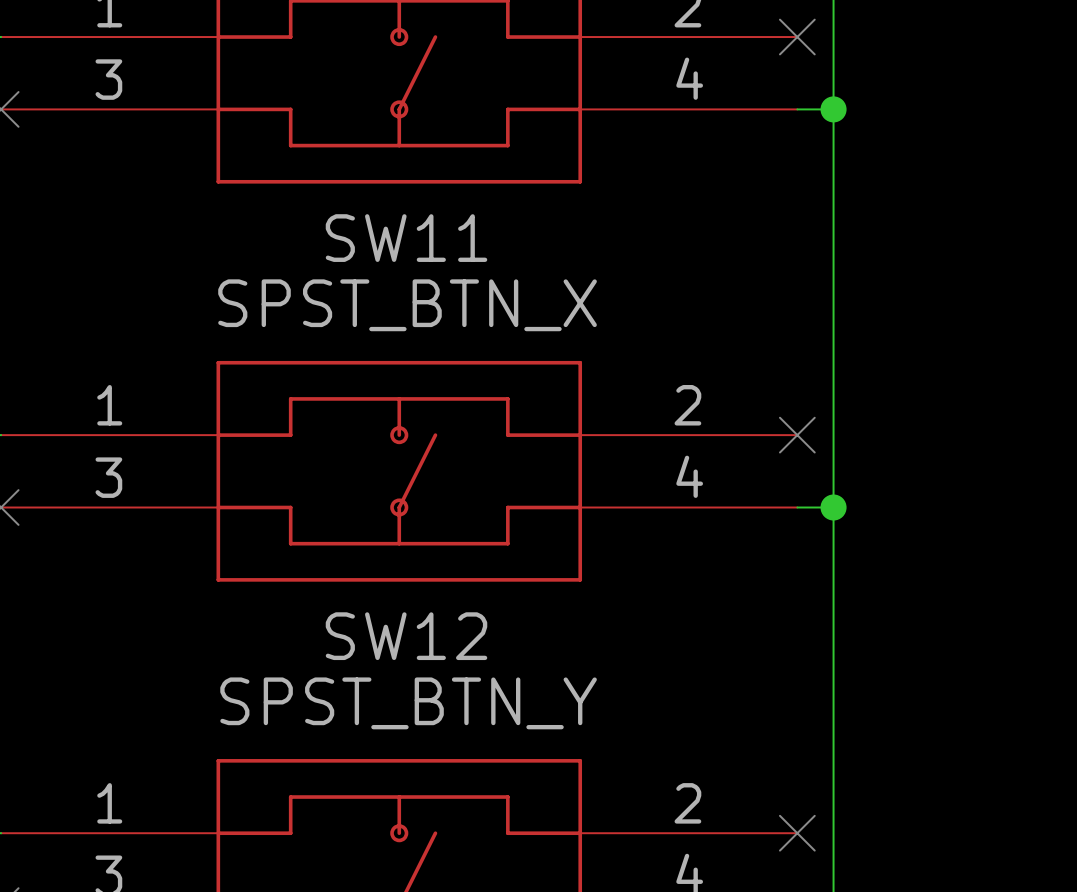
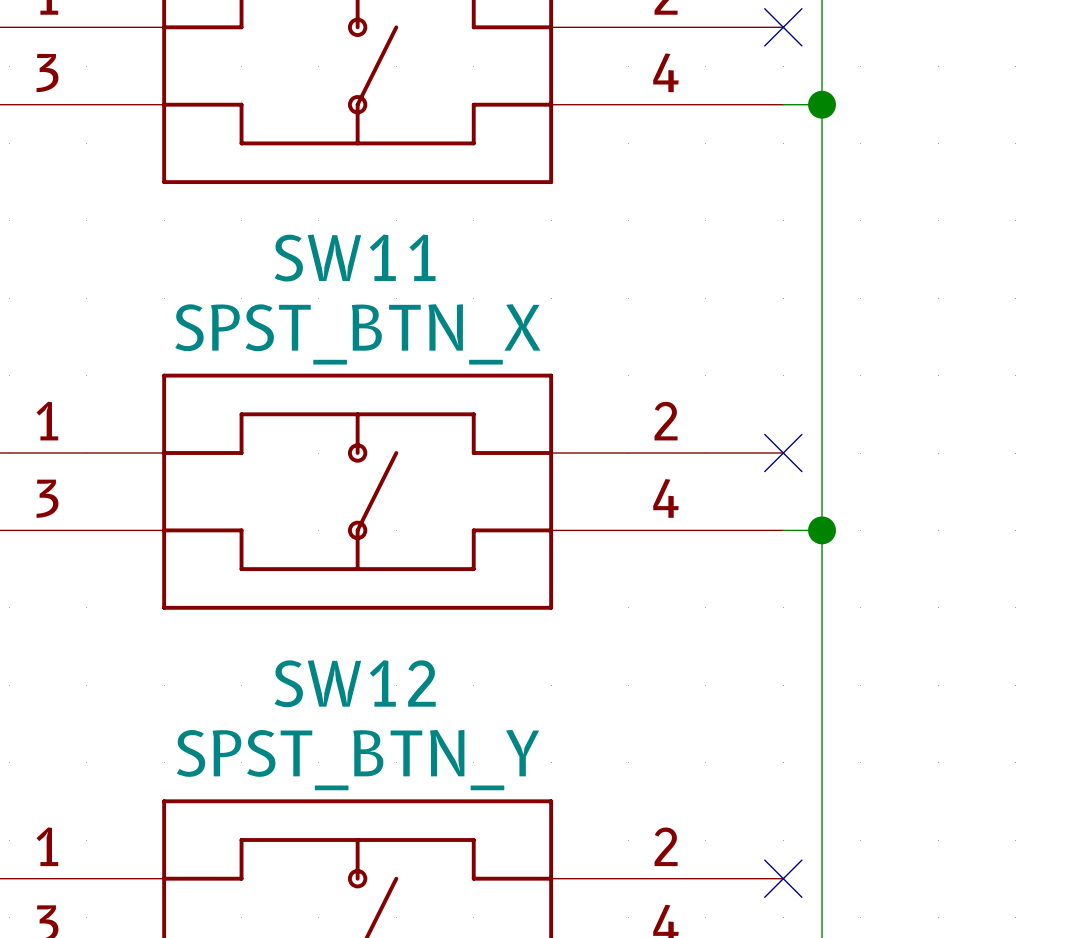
SW11 name position: SW11 (406, 238) -> SW11 (355, 258)
SW11 value position: SPST_BTN_X (407, 305) -> SPST_BTN_X (357, 334)
SW12 name position: SW12 (406, 636) -> SW12 (355, 683)
SW12 value position: SPST_BTN_Y (408, 703) -> SPST_BTN_Y (357, 760)

